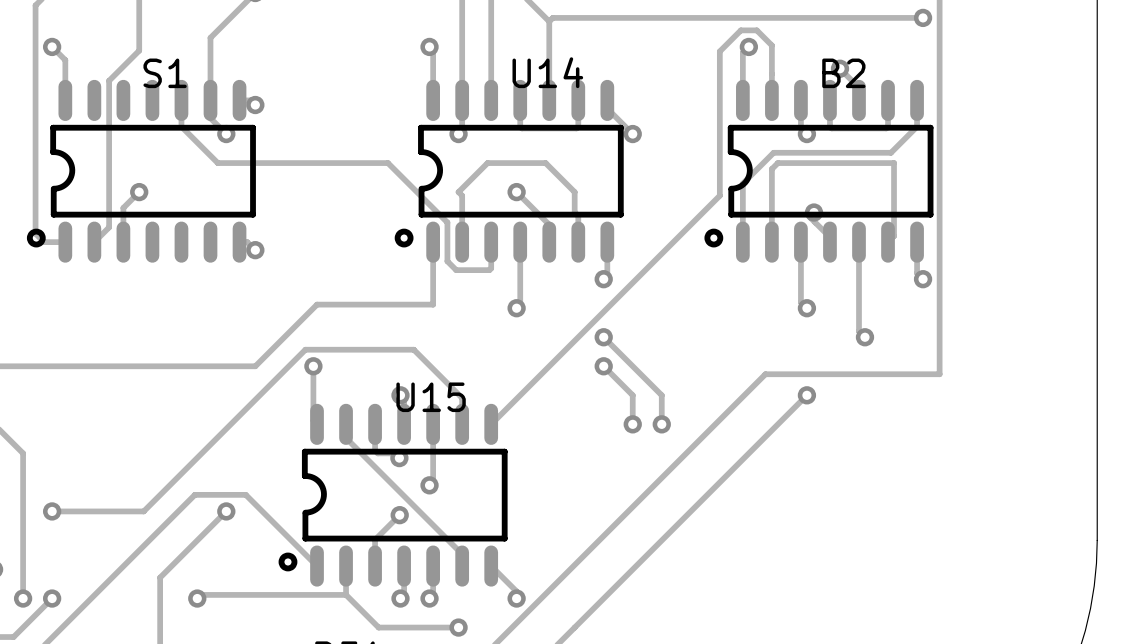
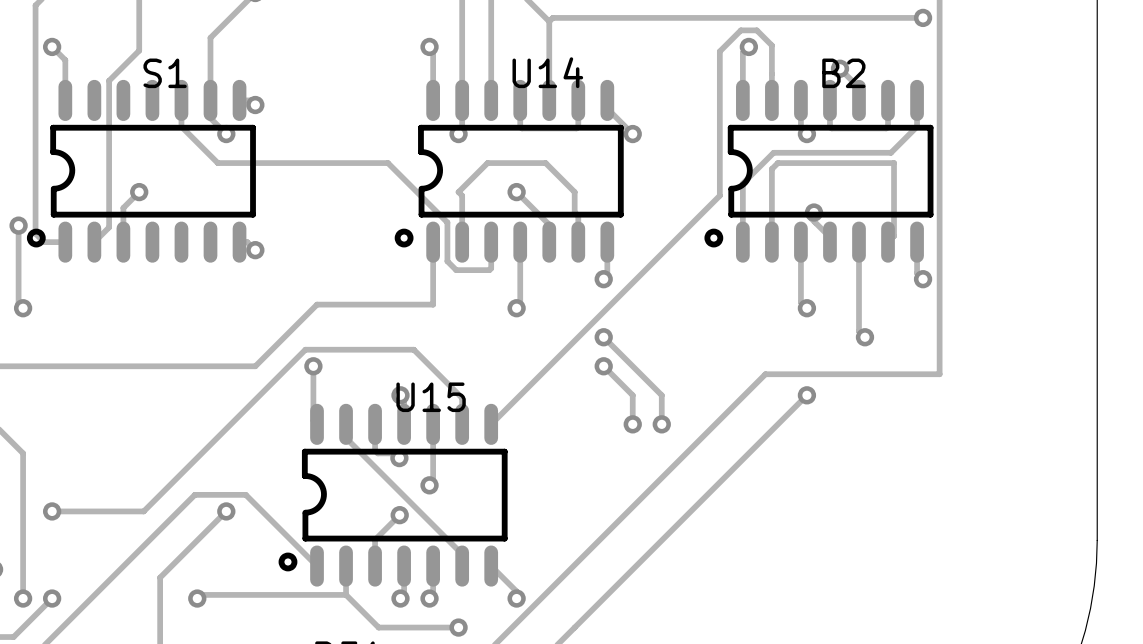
track: none -> (18, 225) (18, 303) (23, 308)
via: none -> (18, 225)
via: none -> (23, 308)

